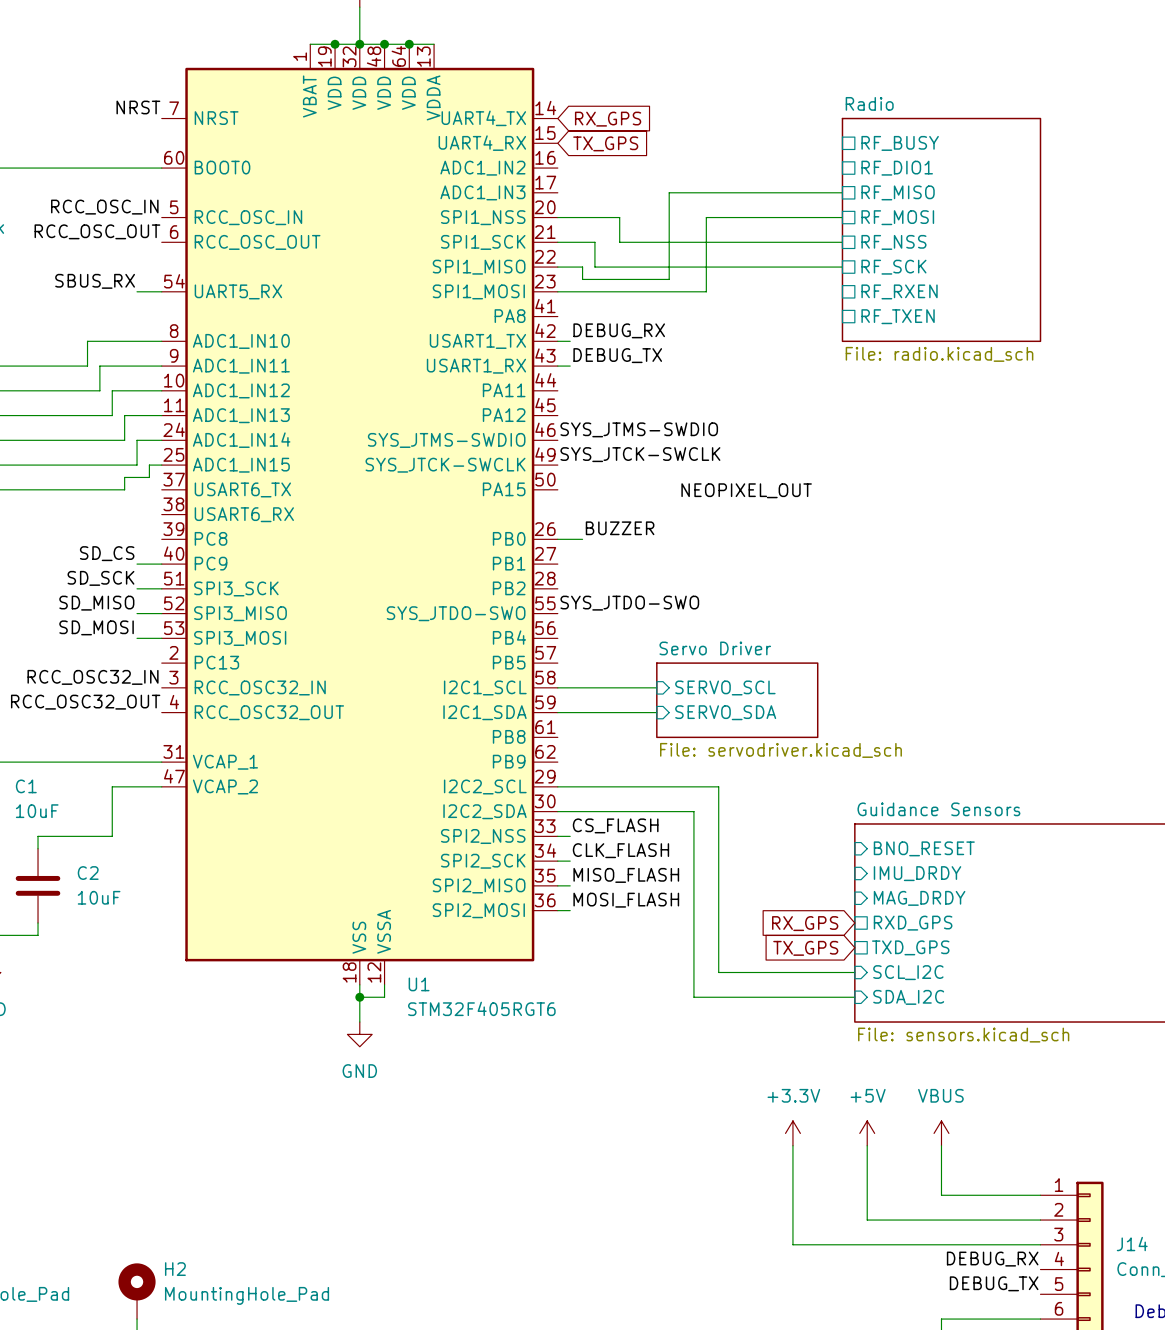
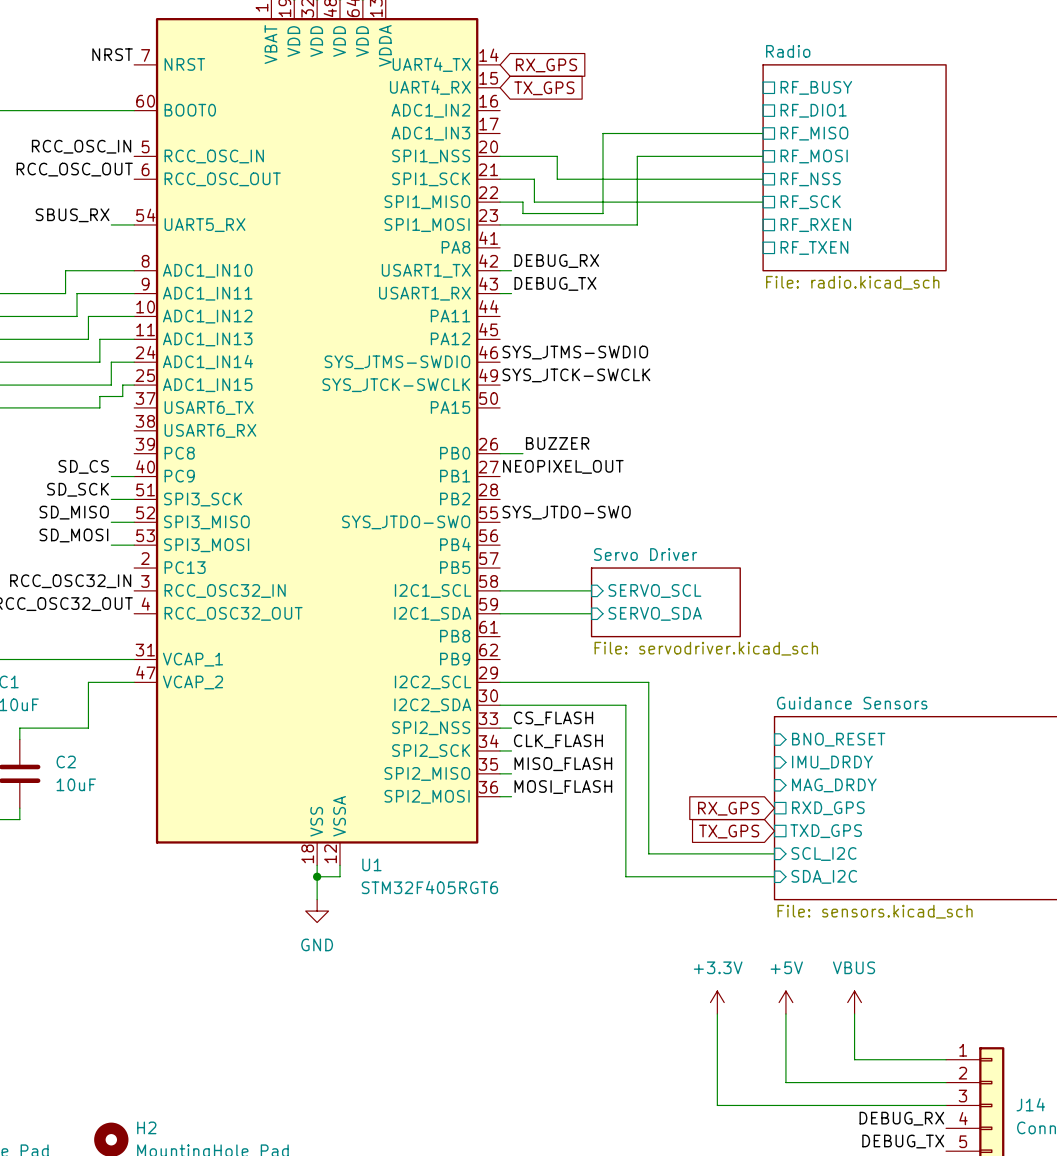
label: NEOPIXEL_OUT (746, 490) -> none
label: none -> NEOPIXEL_OUT (563, 466)

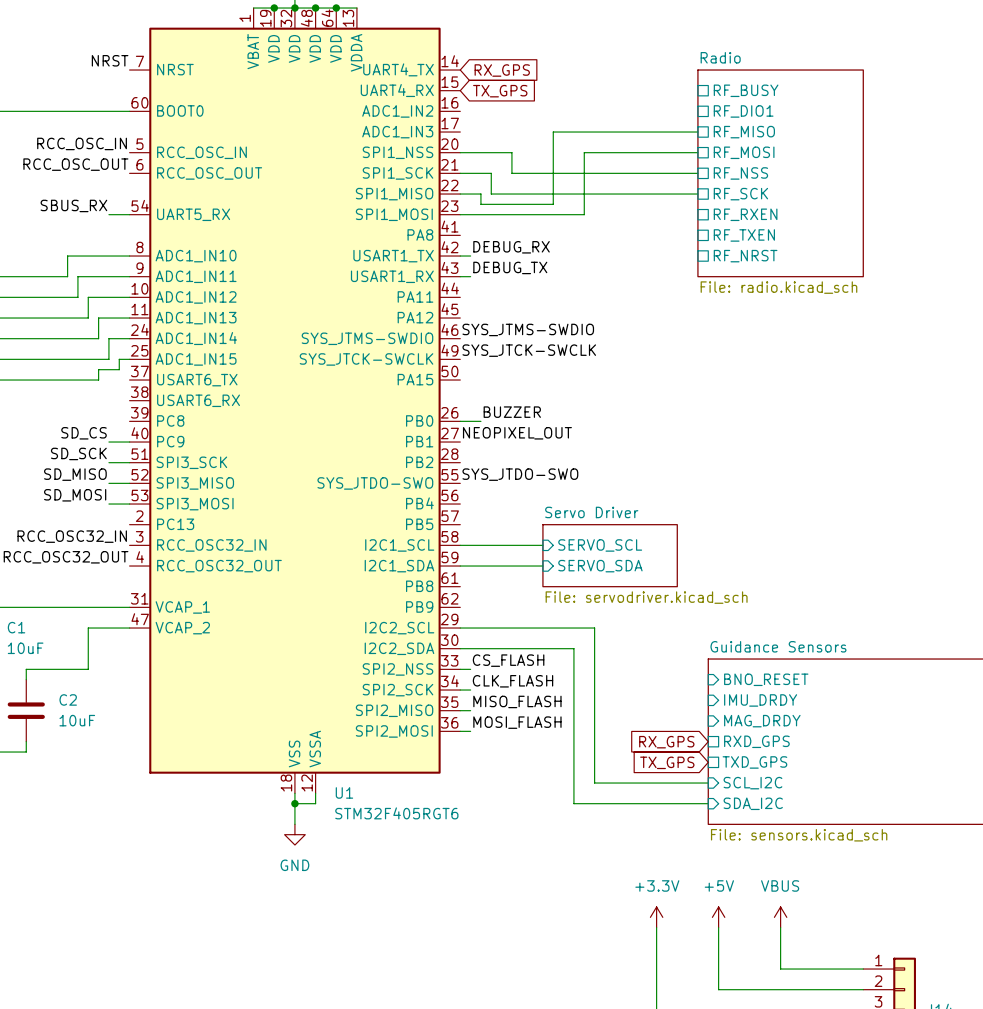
sheet Radio: File: radio.kicad_sch (854, 167) -> none
sheet Radio: none -> File: radio.kicad_sch (780, 173)
sheet pin: none -> RF_NRST (745, 256)

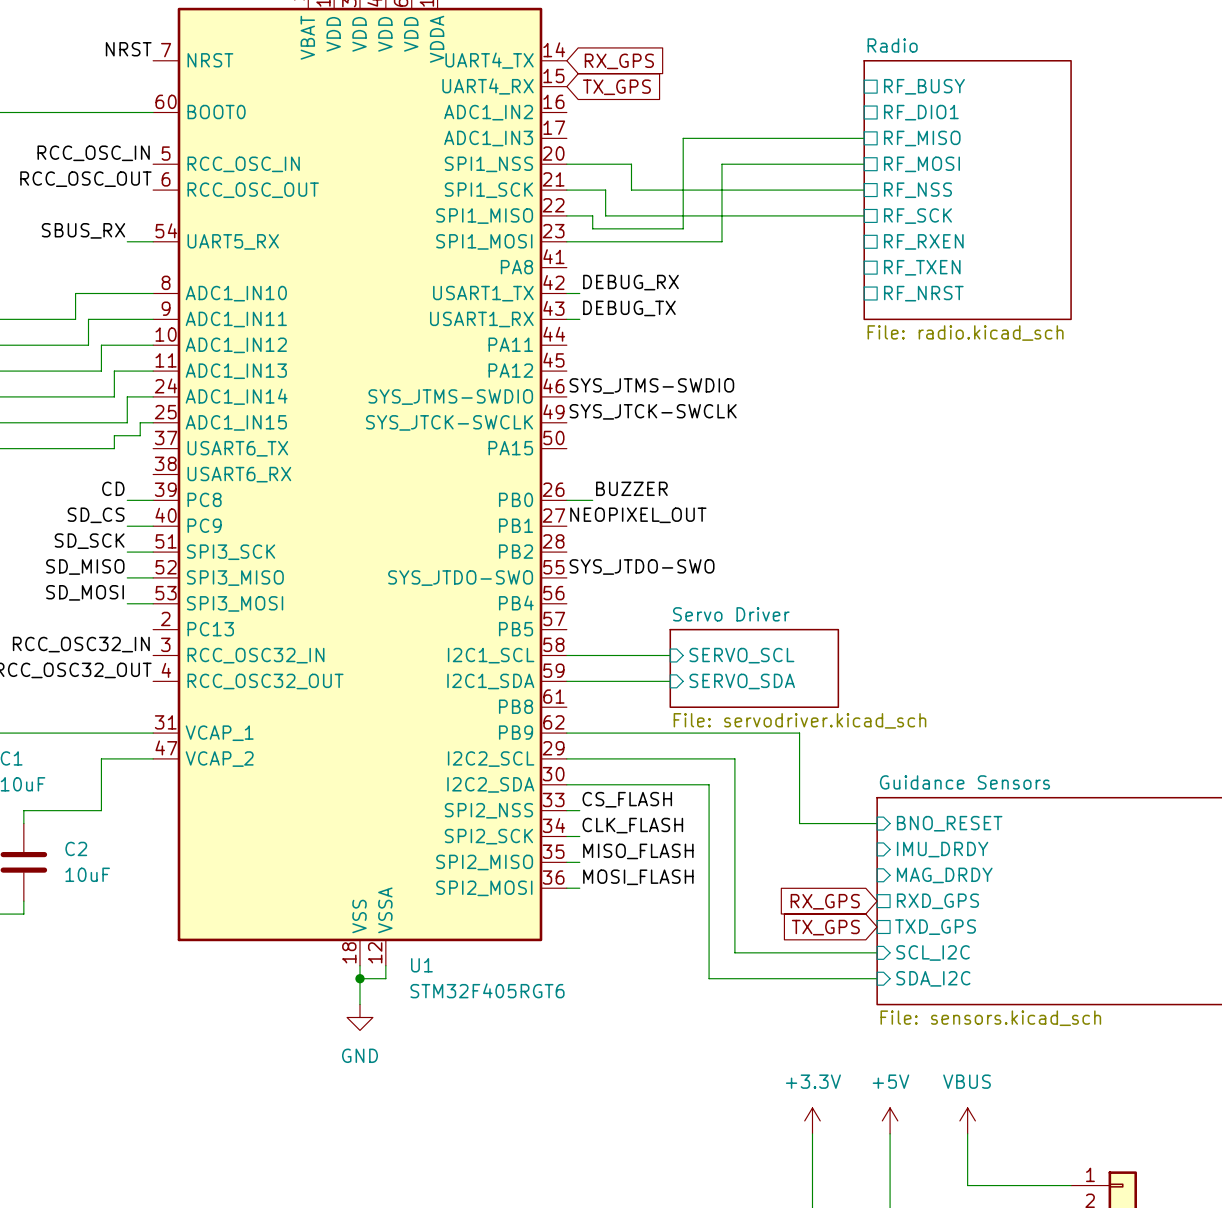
label: none -> CD (113, 488)
wire: none -> (127, 500) (153, 500)
wire: none -> (566, 733) (799, 733) (799, 823) (877, 823)

